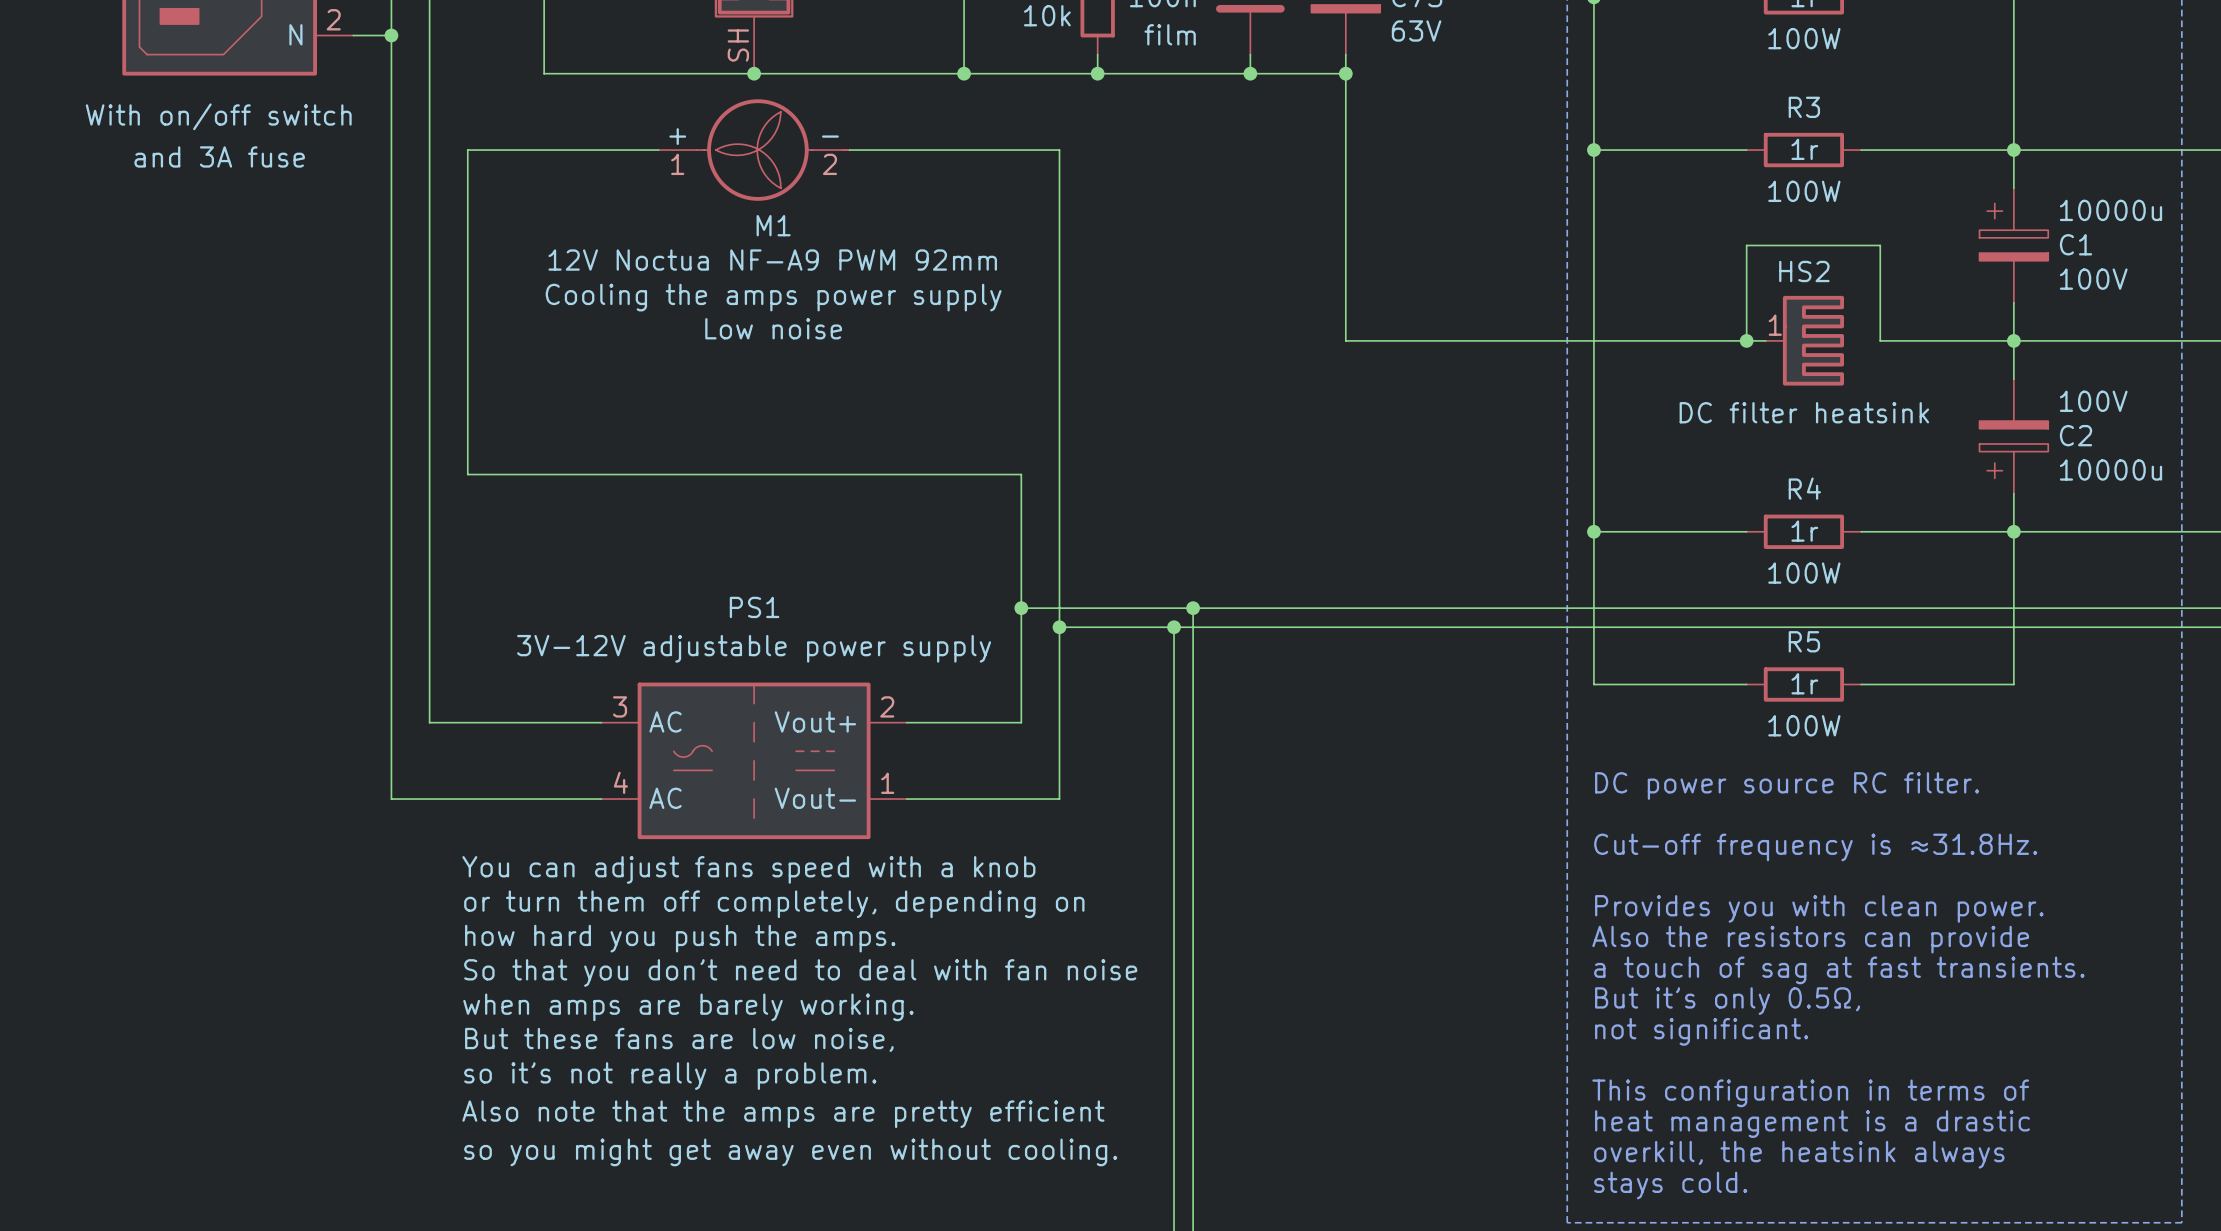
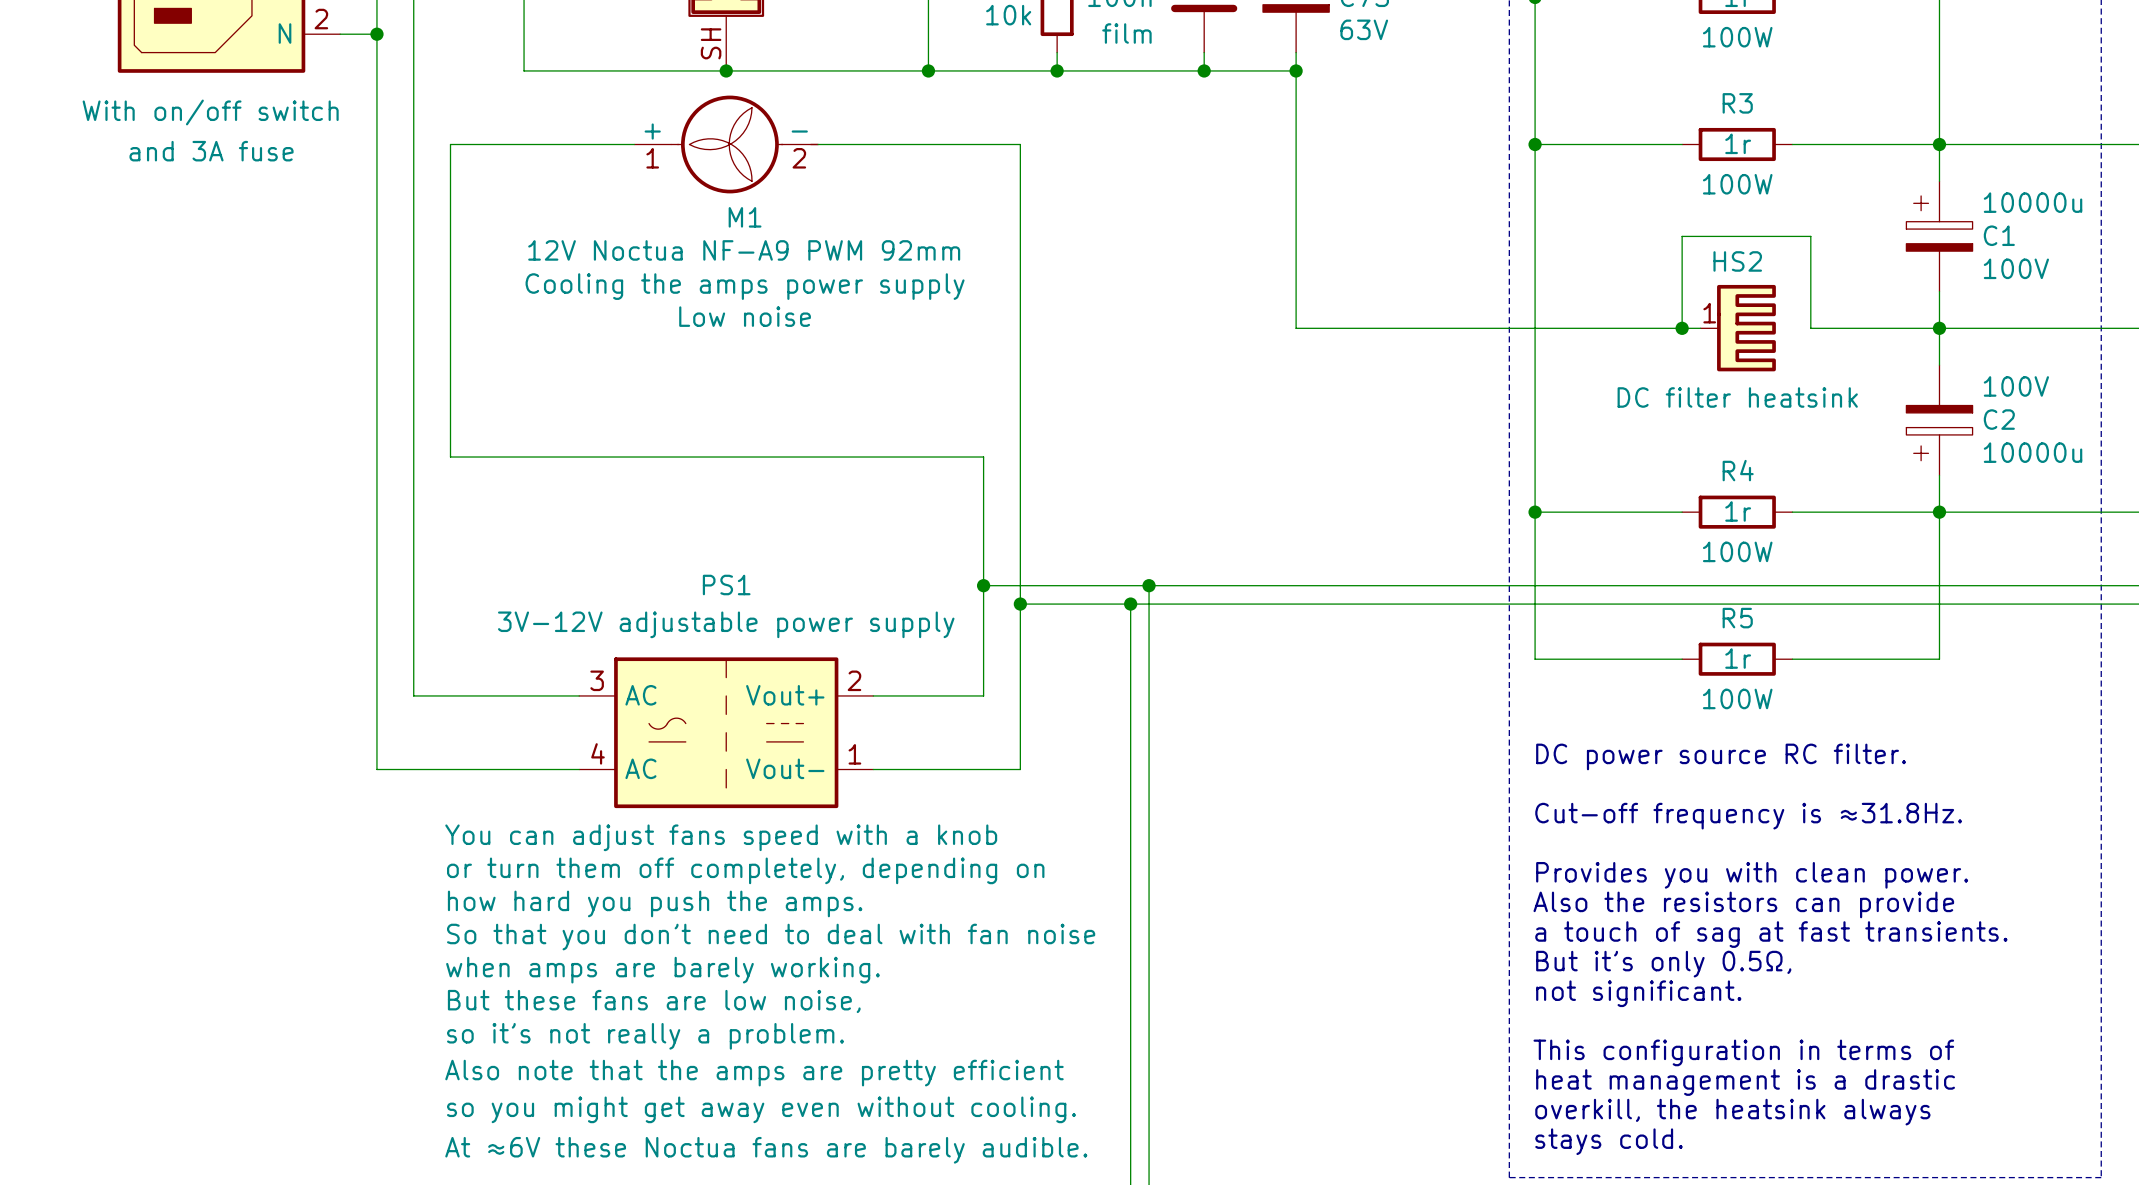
PS1 text: none -> At ≈6V these Noctua fans are barely audible. (766, 1150)

